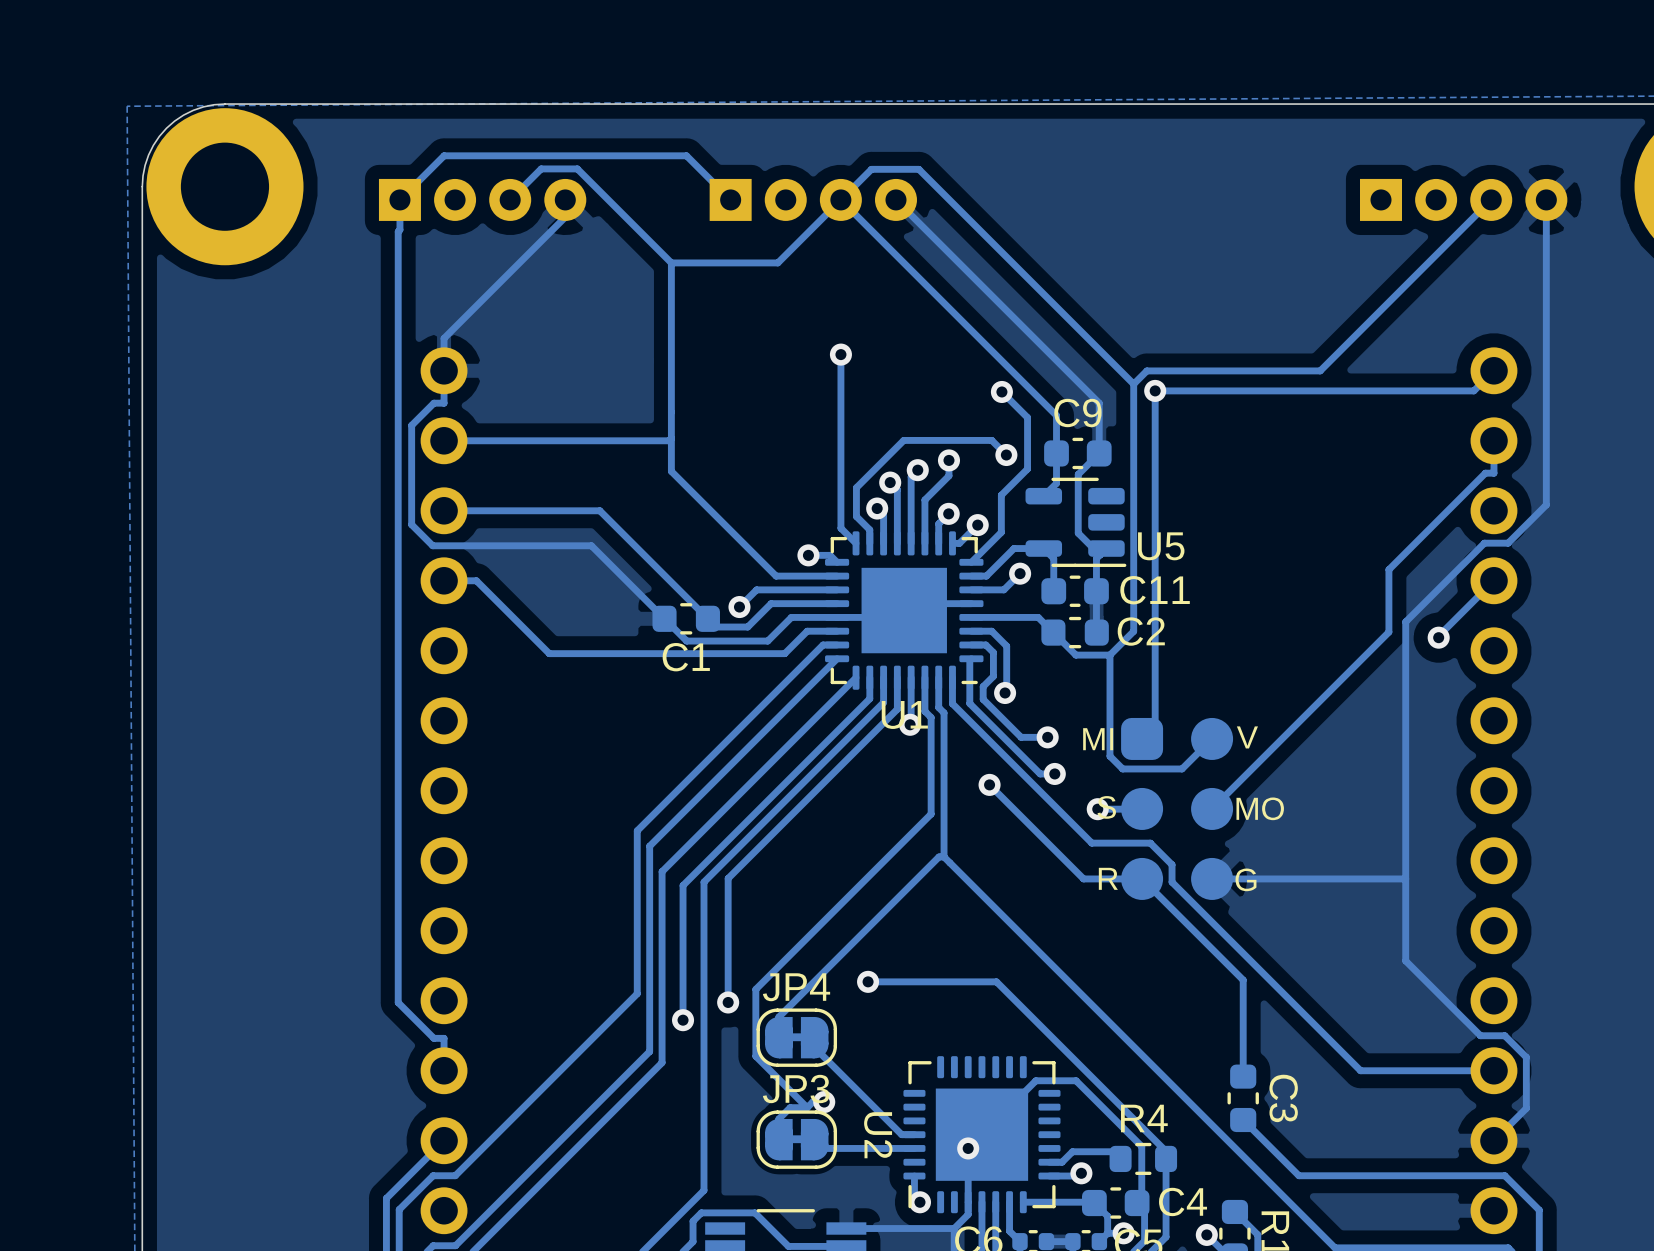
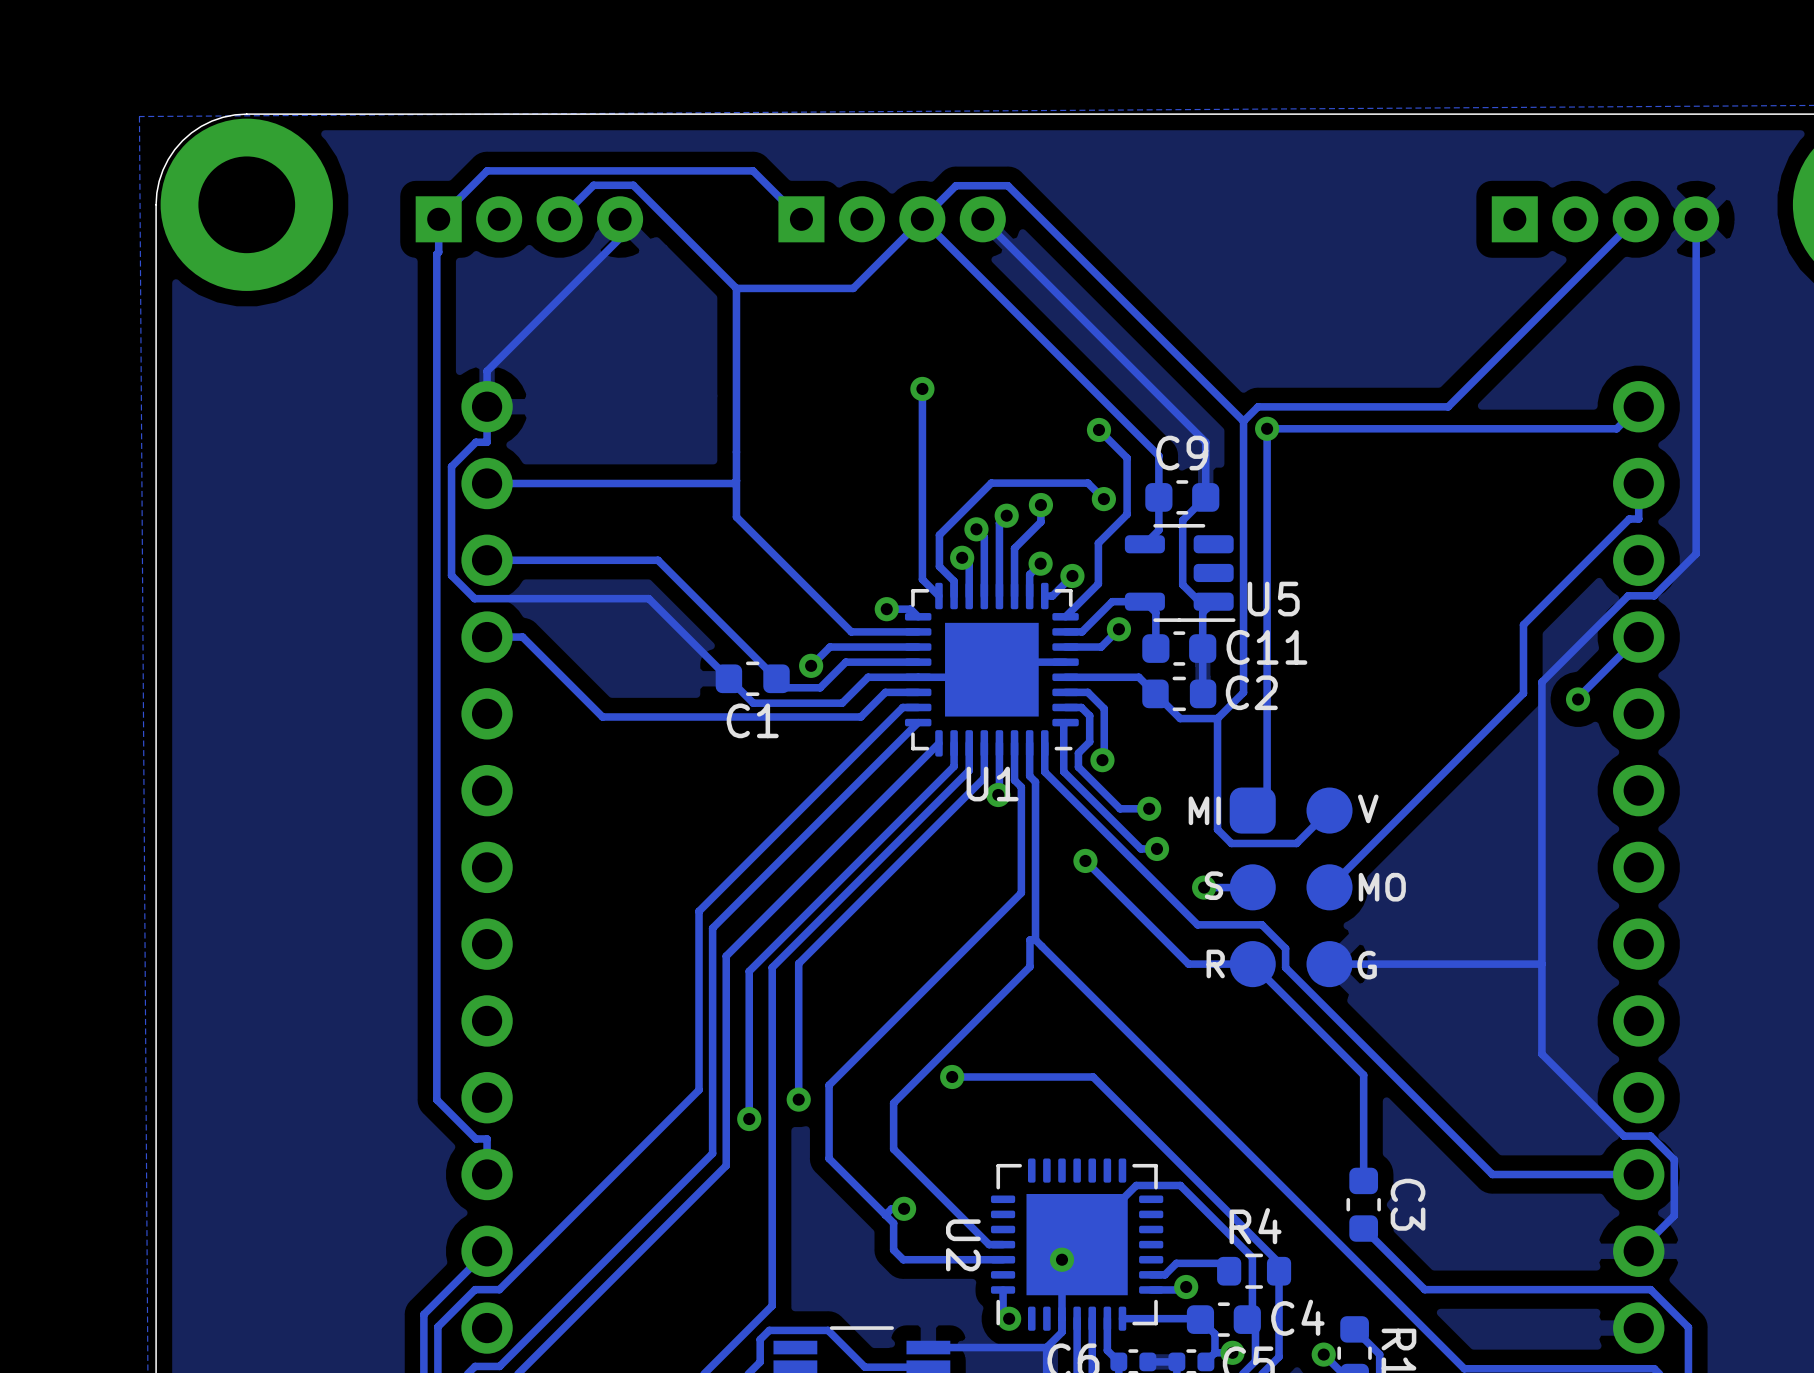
track: (938, 856) (778, 1017) (778, 1037) -> (1029, 939) (1029, 966) (893, 1103) (893, 1138)
JP4: (796, 1037) -> none
track: (807, 1107) (790, 1107) (778, 1119) (778, 1139) -> (885, 1214) (893, 1223) (893, 1250)
JP3: (796, 1139) -> none

